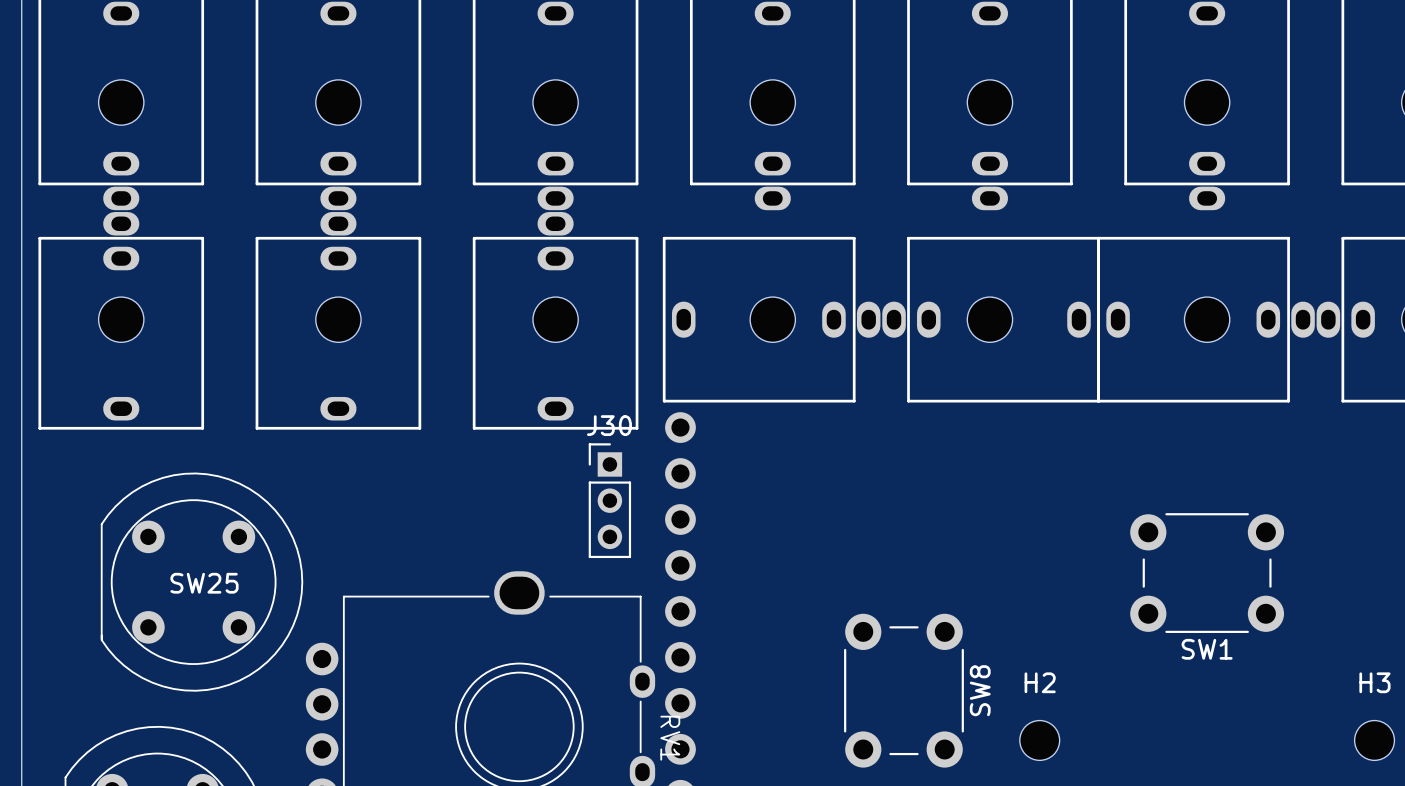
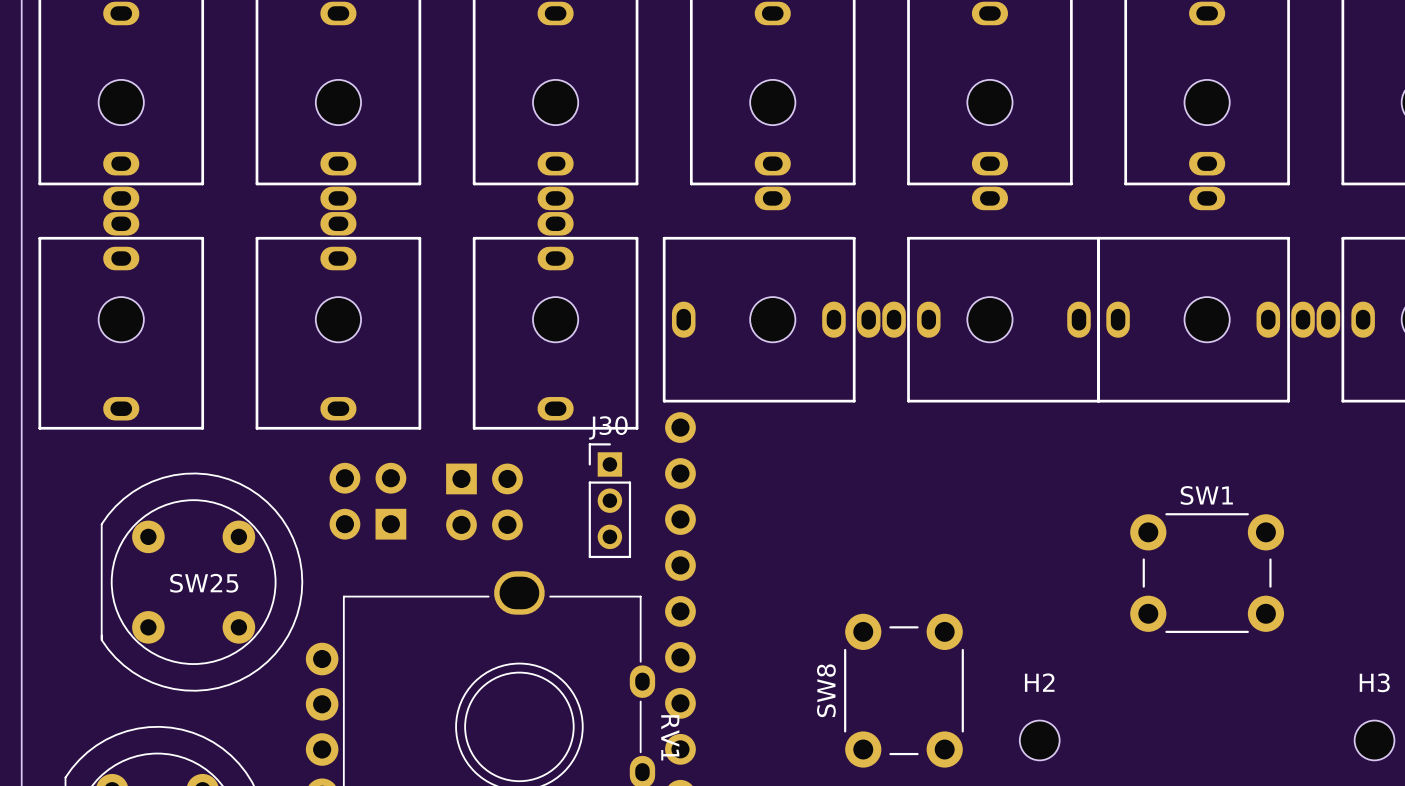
part: none -> (367, 501)
part: none -> (484, 501)
SW1 name position: SW1 (1207, 649) -> SW1 (1206, 495)
SW8 name position: SW8 (980, 690) -> SW8 (826, 690)

